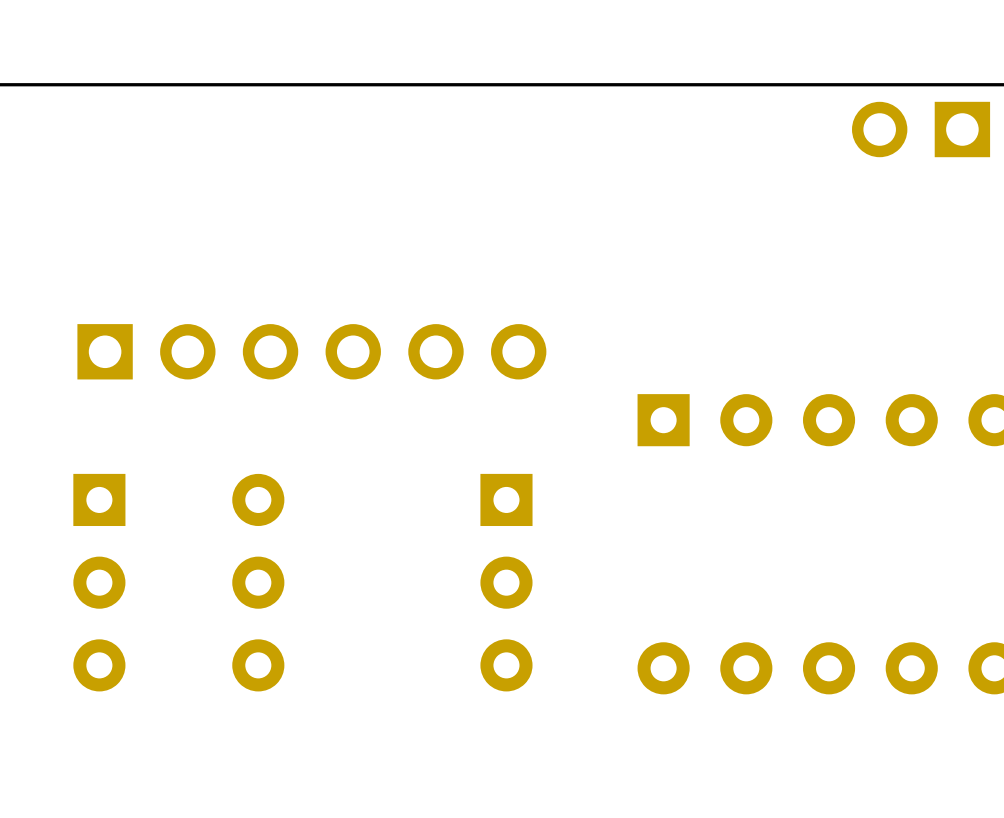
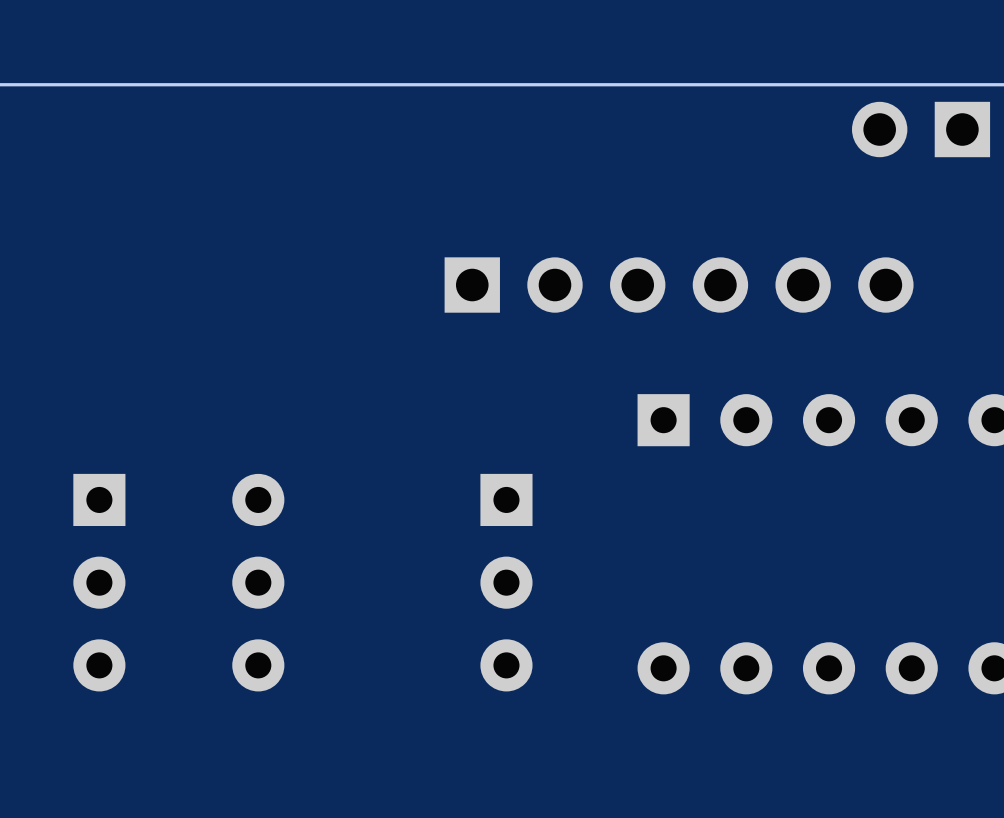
part position: (311, 351) -> (679, 285)

